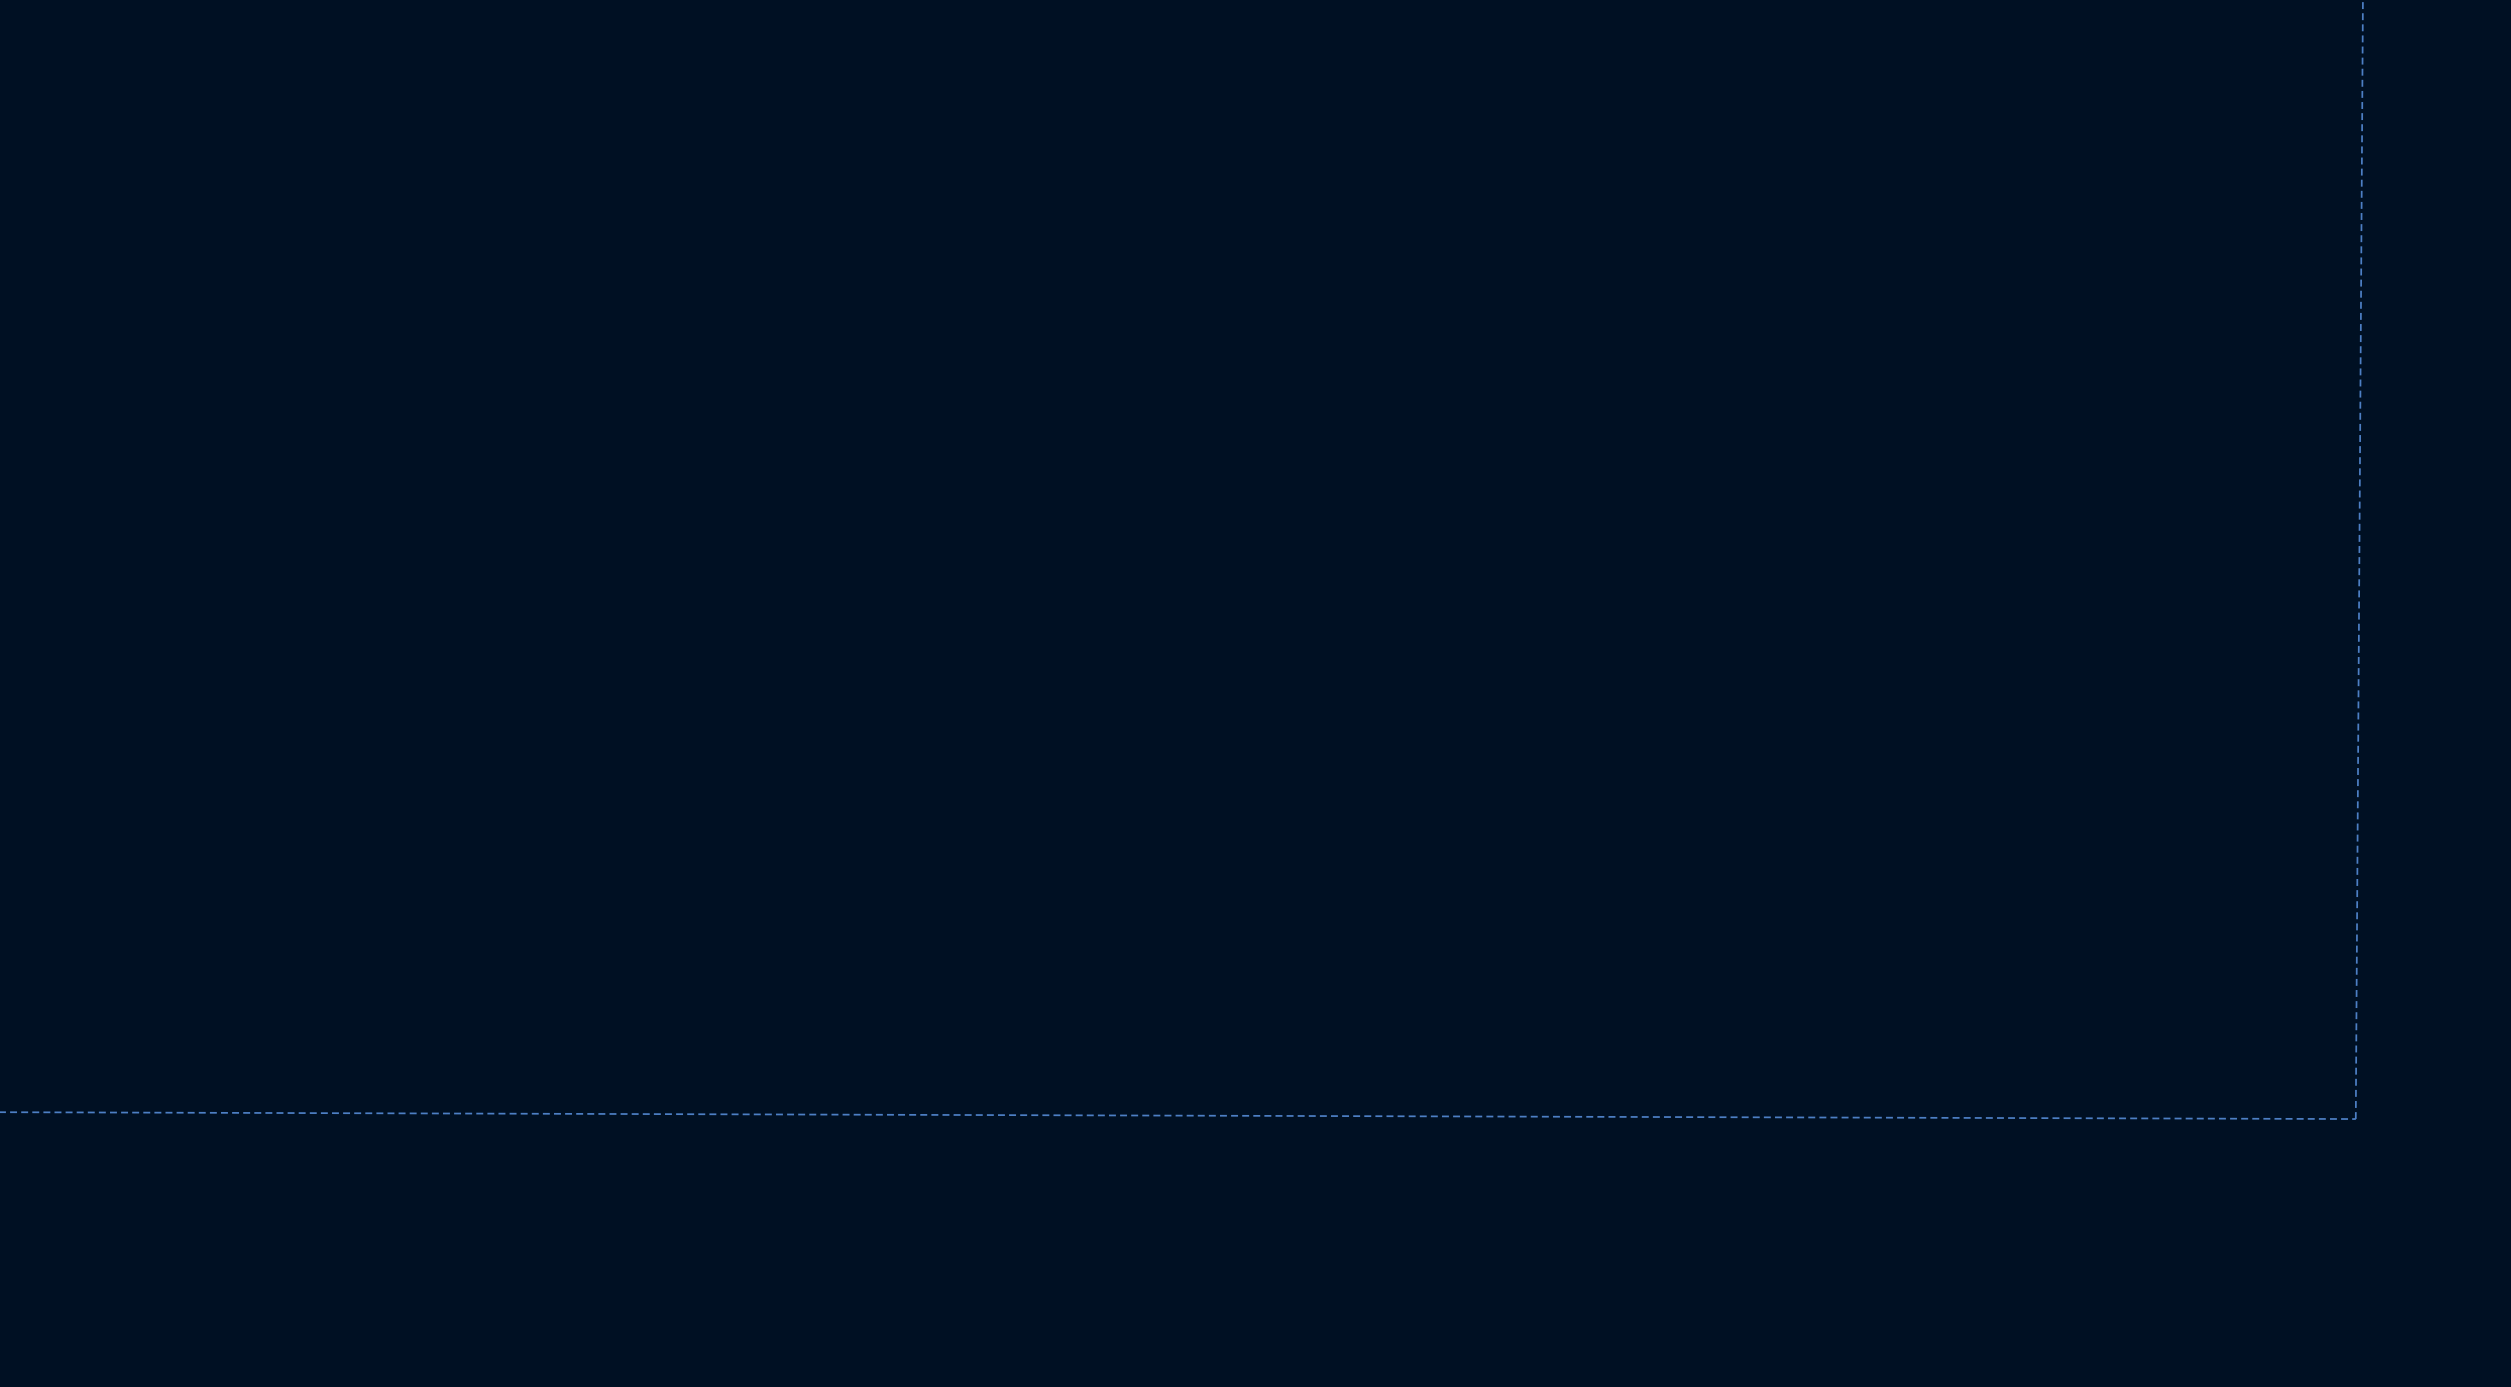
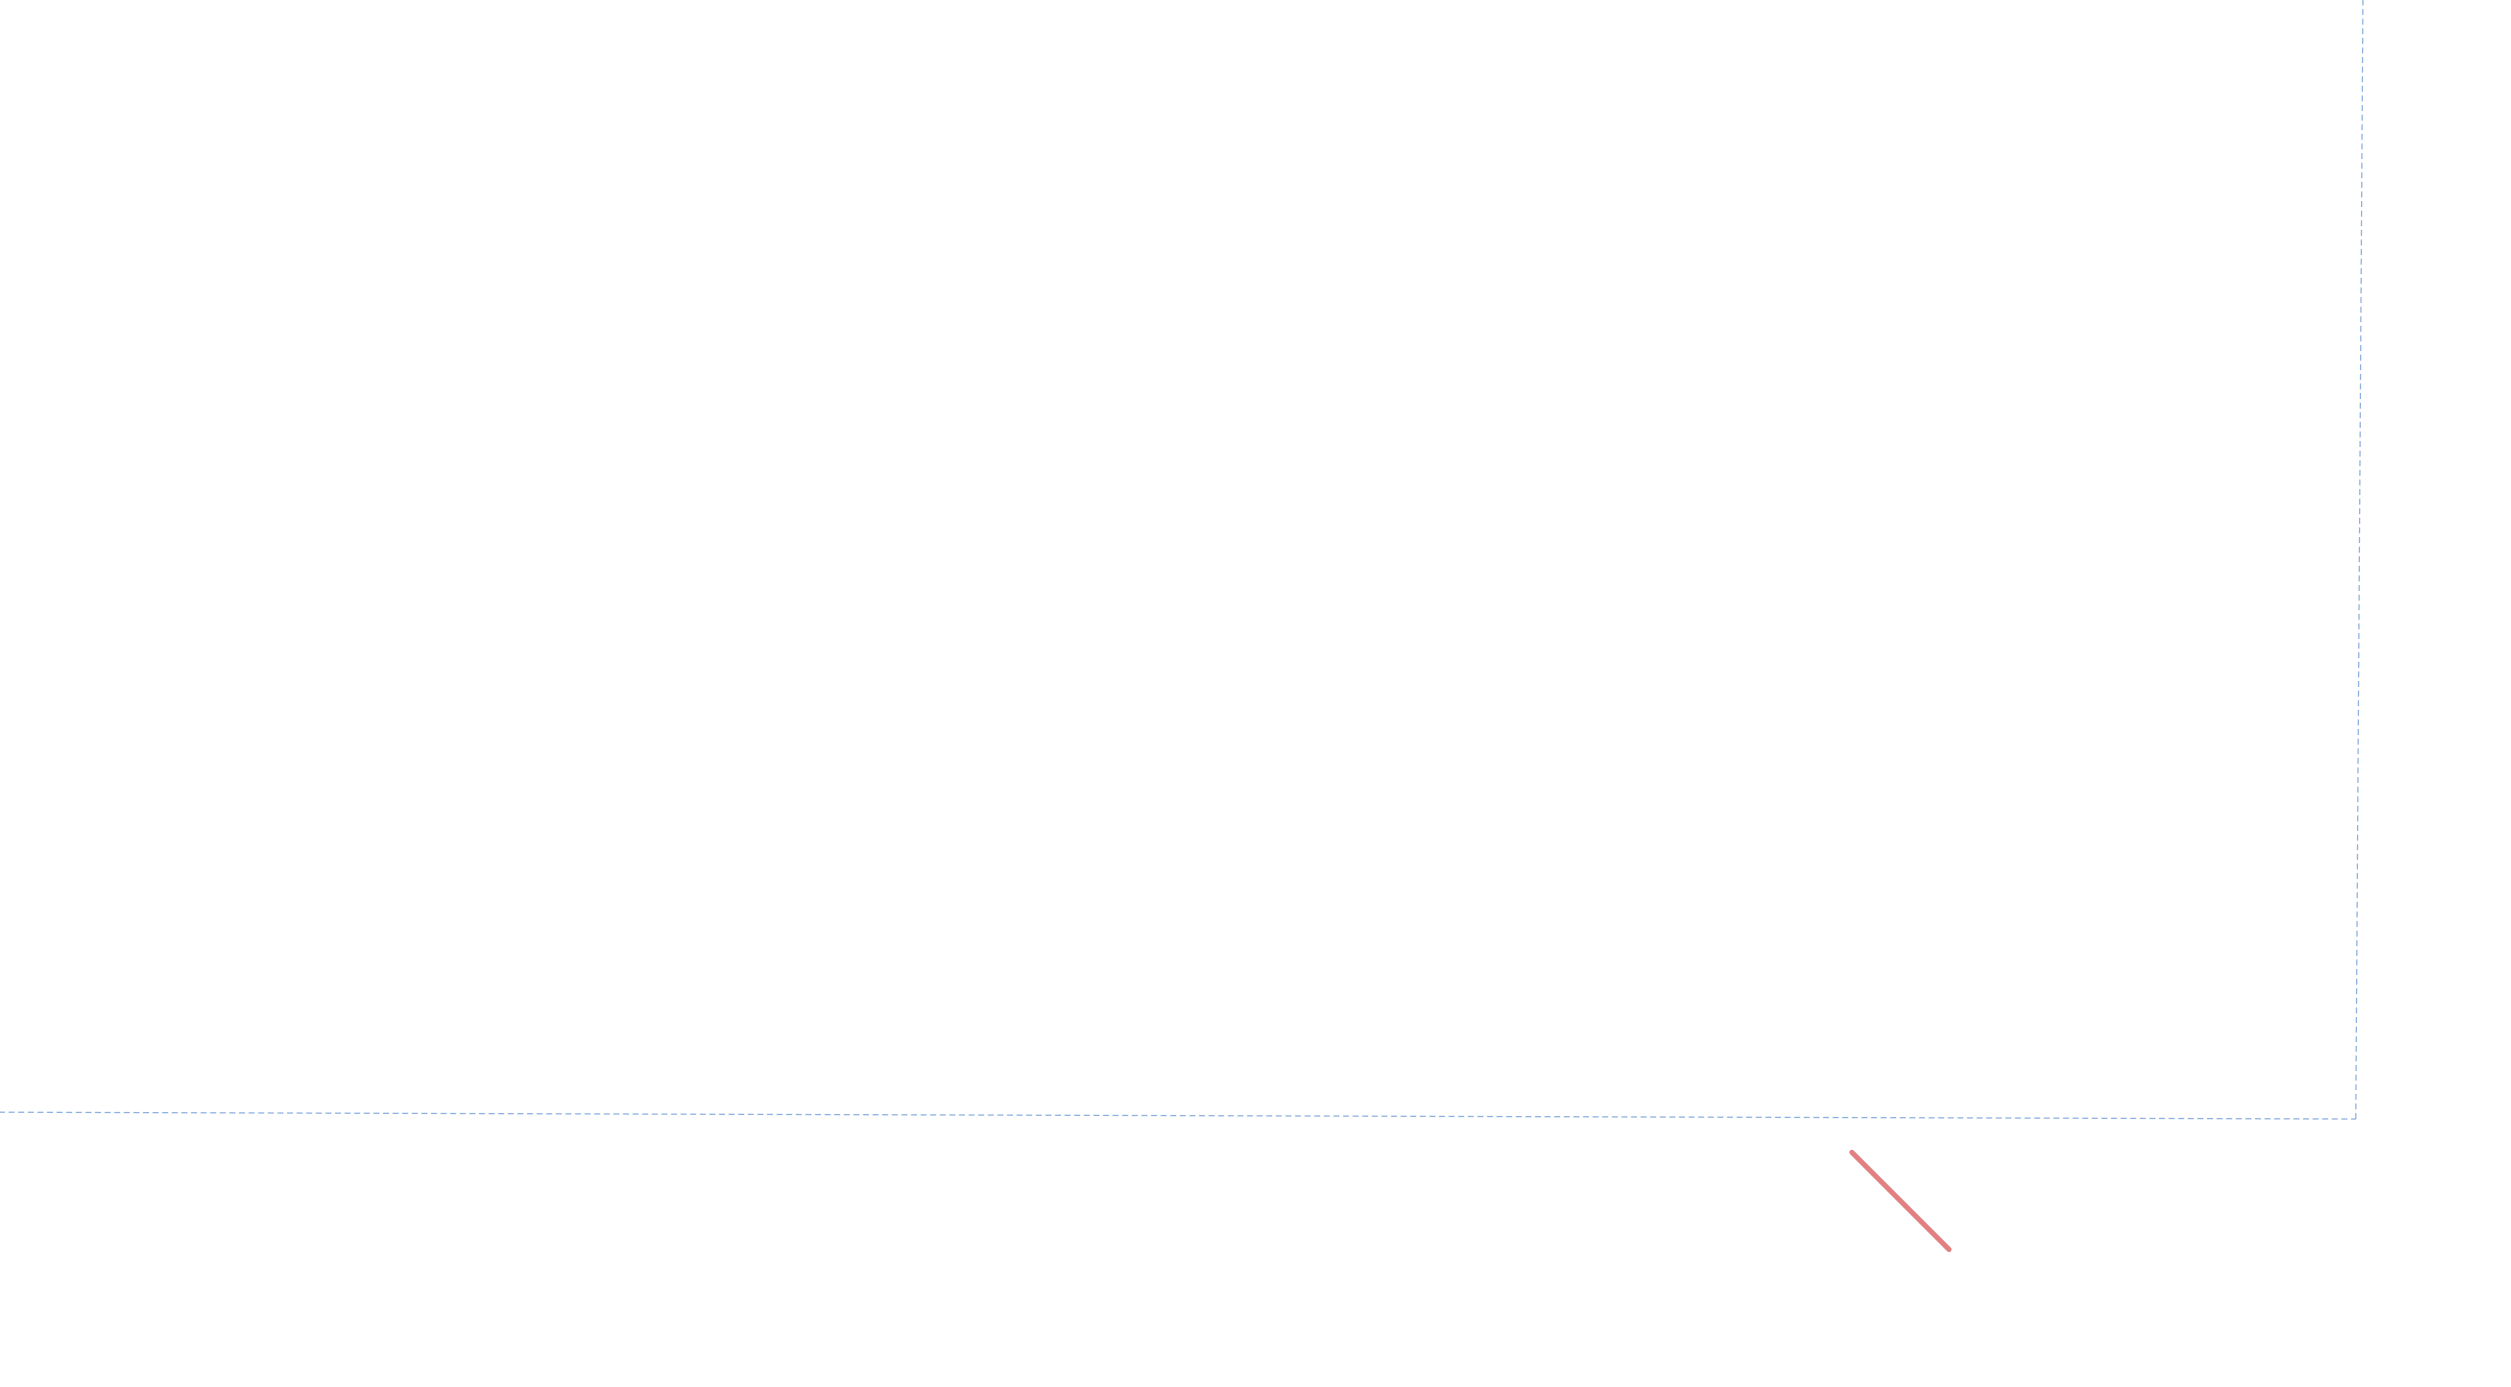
top track: none -> (1851, 1152) (1949, 1249)

